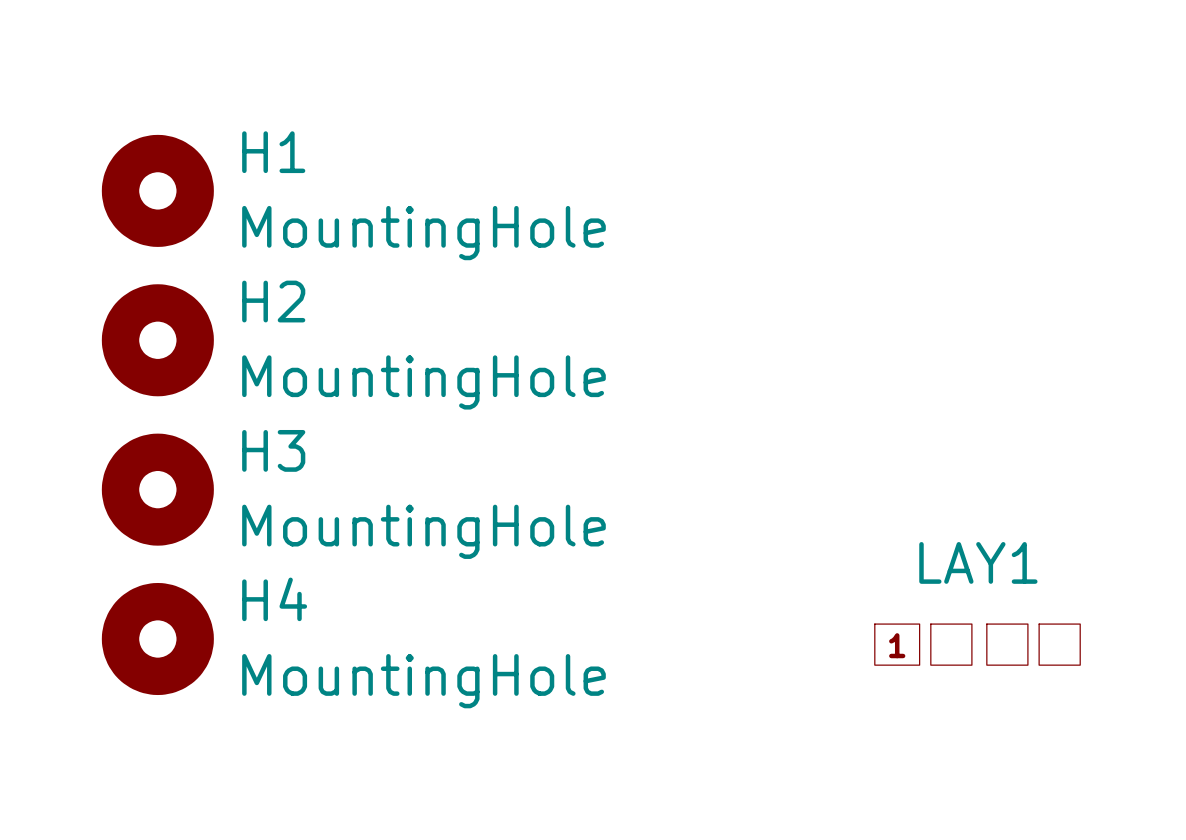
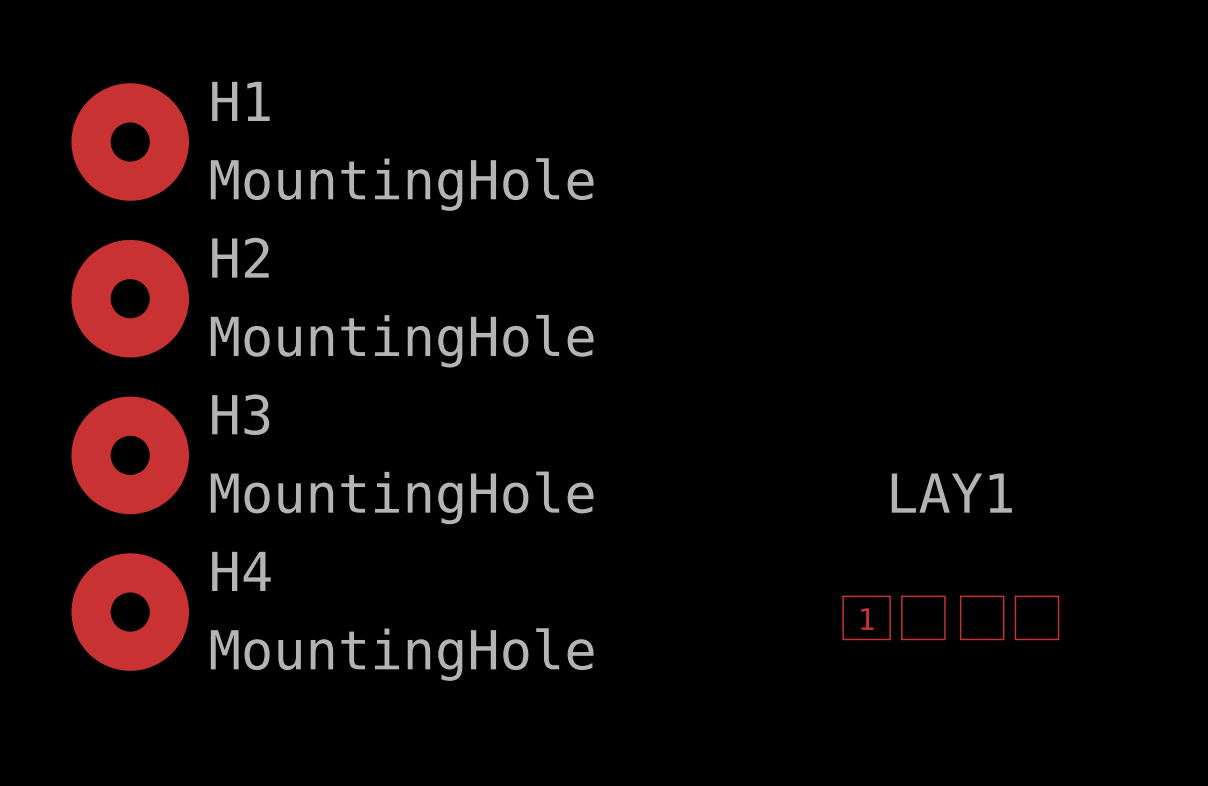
LAY1 name position: LAY1 (978, 562) -> LAY1 (951, 493)
LAY1 position: (977, 644) -> (950, 617)

